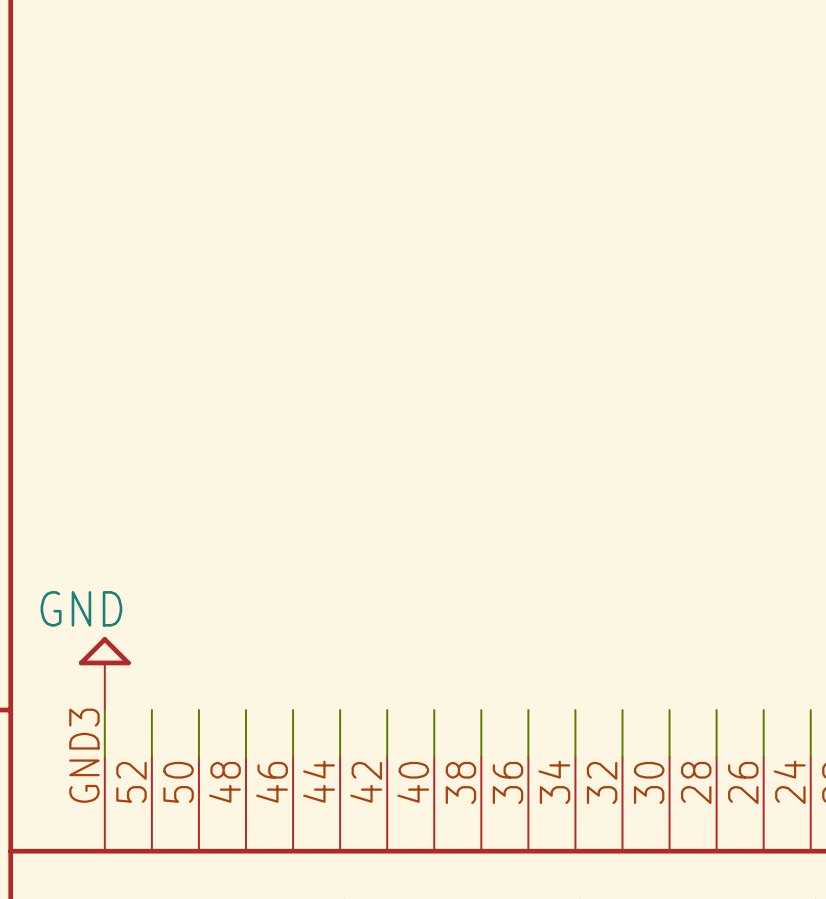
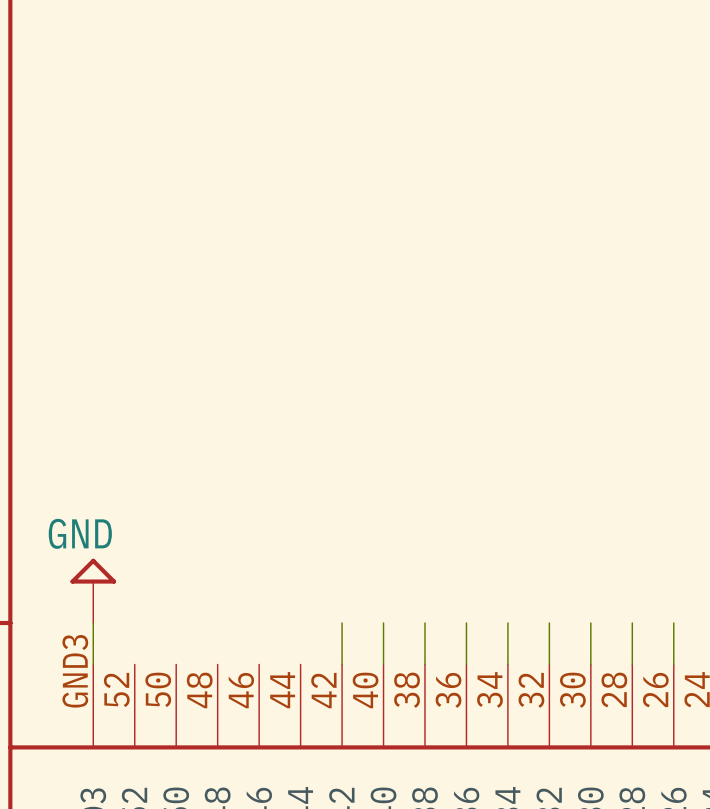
wire: (151, 710) (151, 757) -> none
wire: (198, 710) (198, 757) -> none
wire: (246, 710) (246, 757) -> none
wire: (293, 710) (293, 757) -> none
wire: (340, 710) (340, 757) -> none

